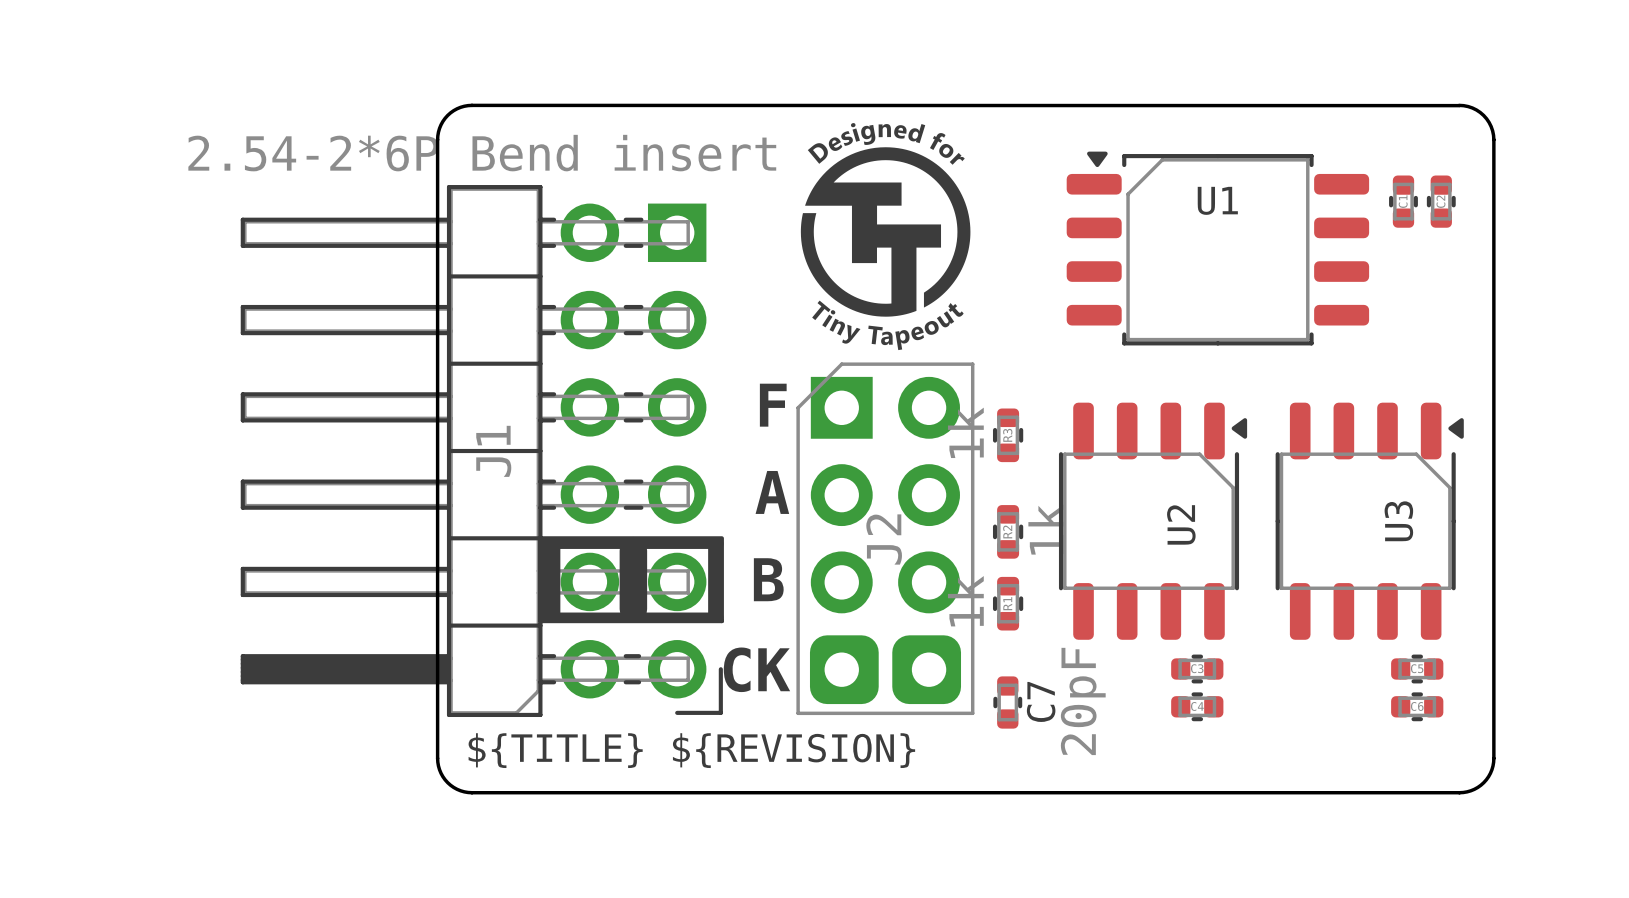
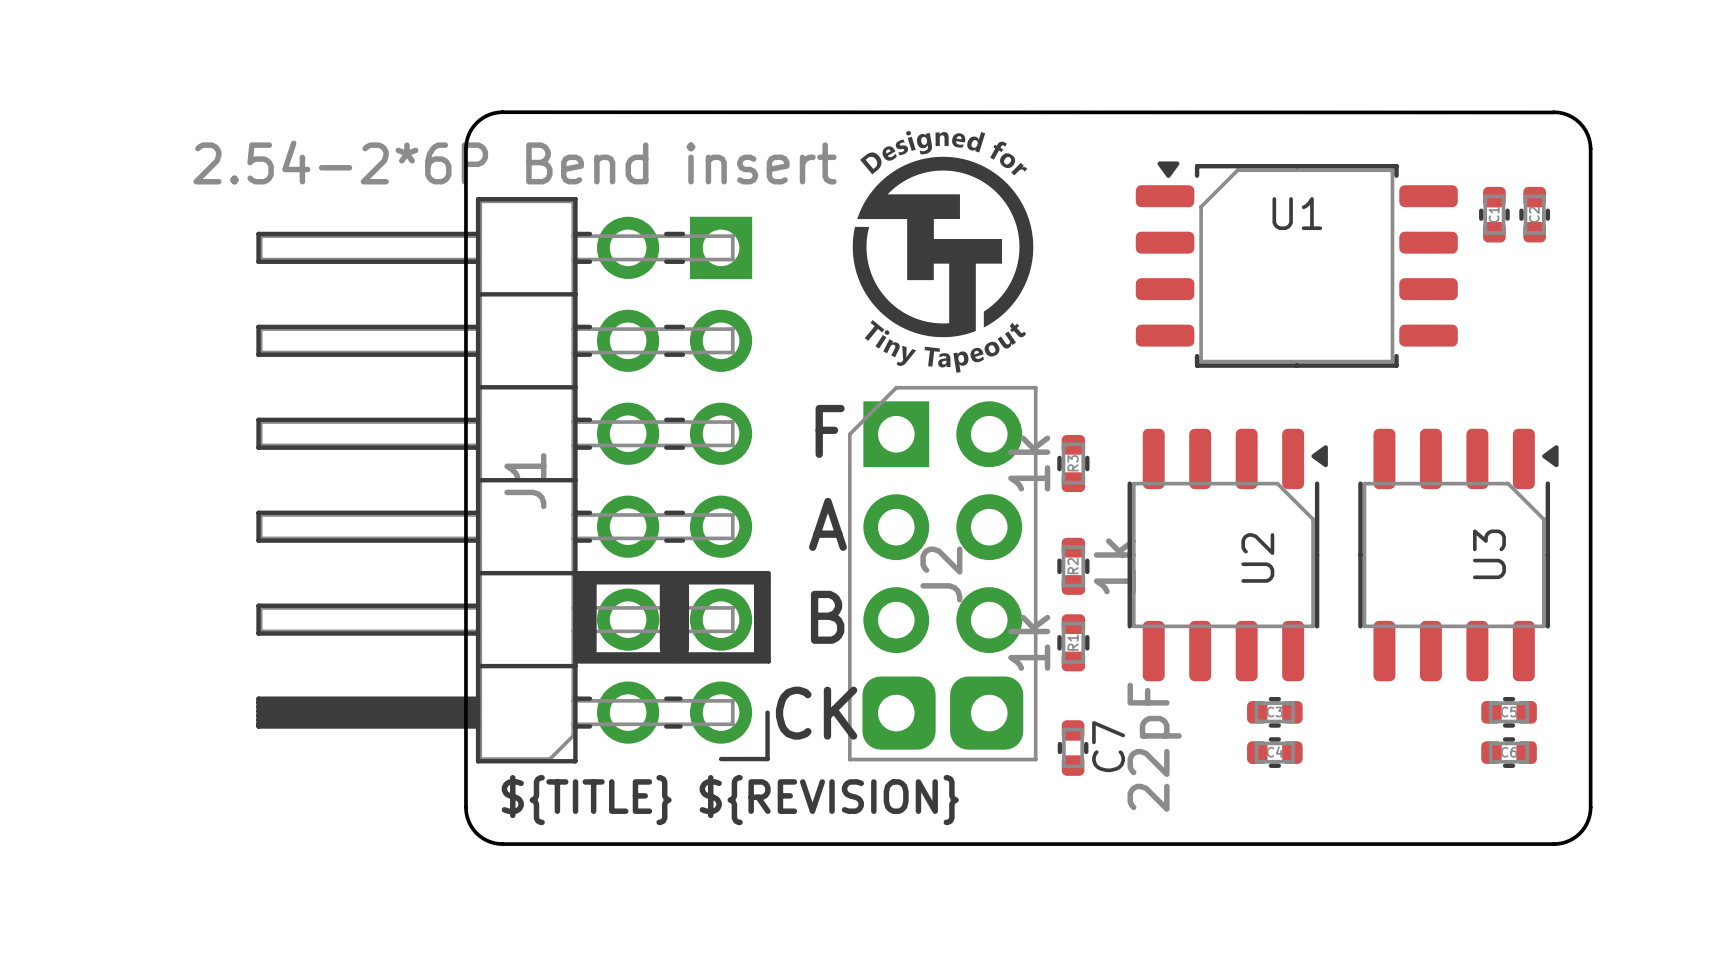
C7 value: 20pF (1083, 701) -> 22pF (1154, 747)

